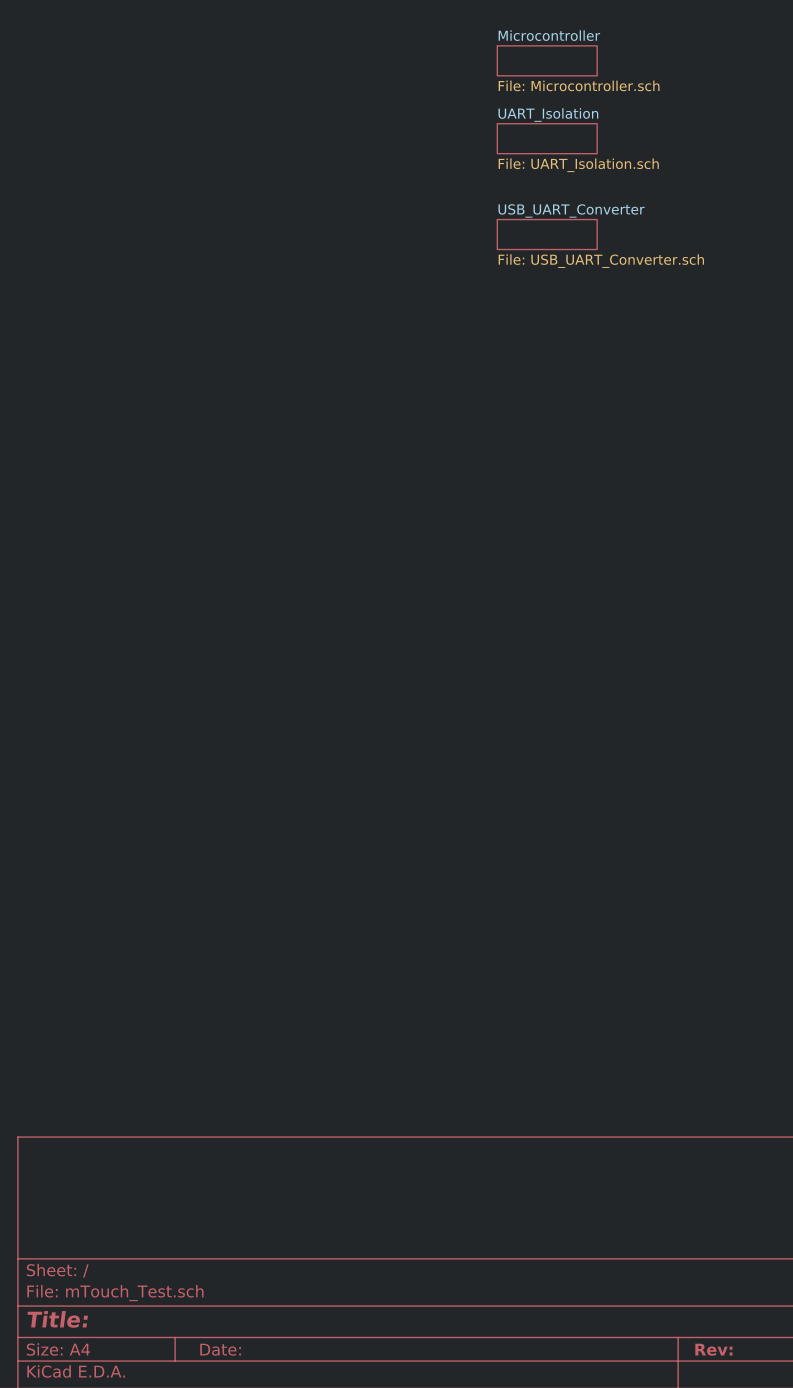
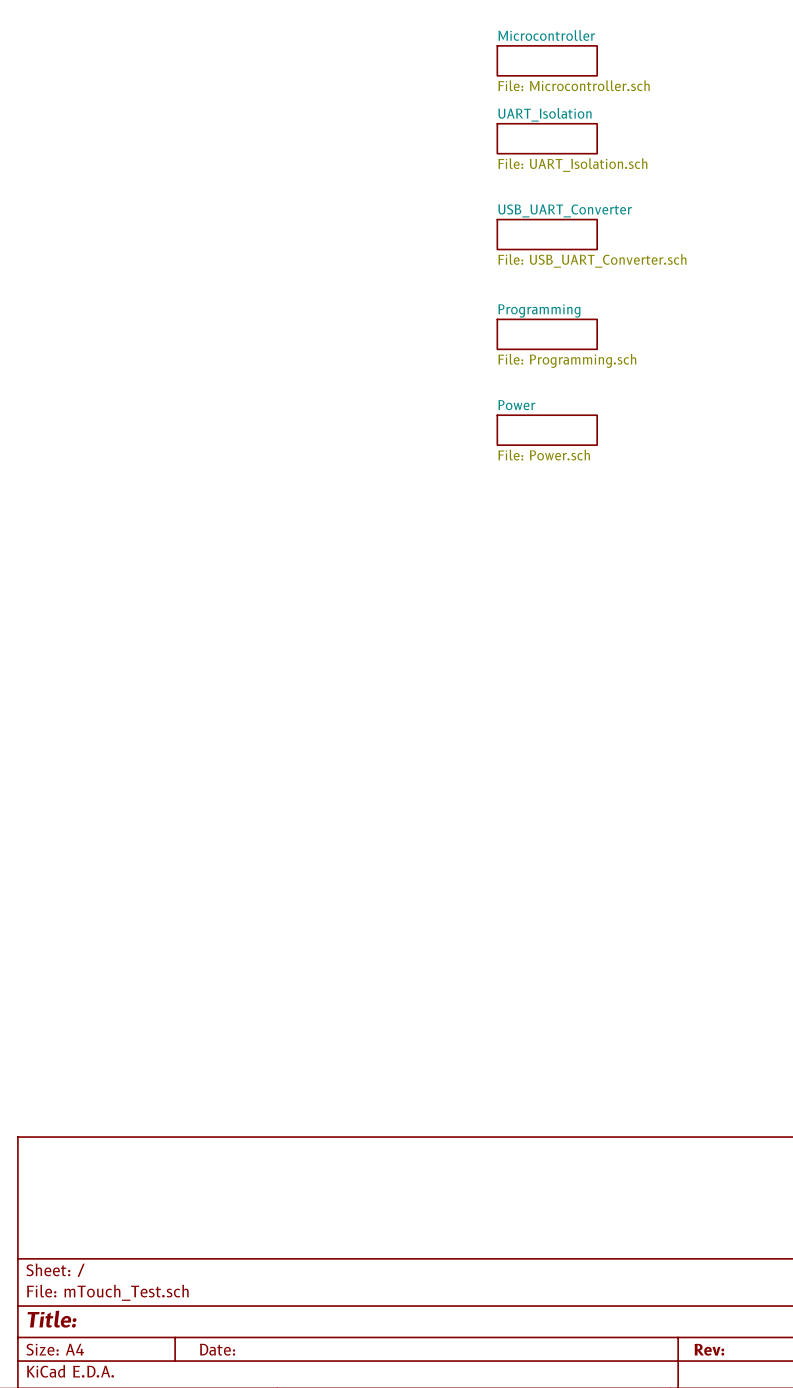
sheet Programming: none -> File: Programming.sch (547, 334)
sheet Power: none -> File: Power.sch (547, 430)

